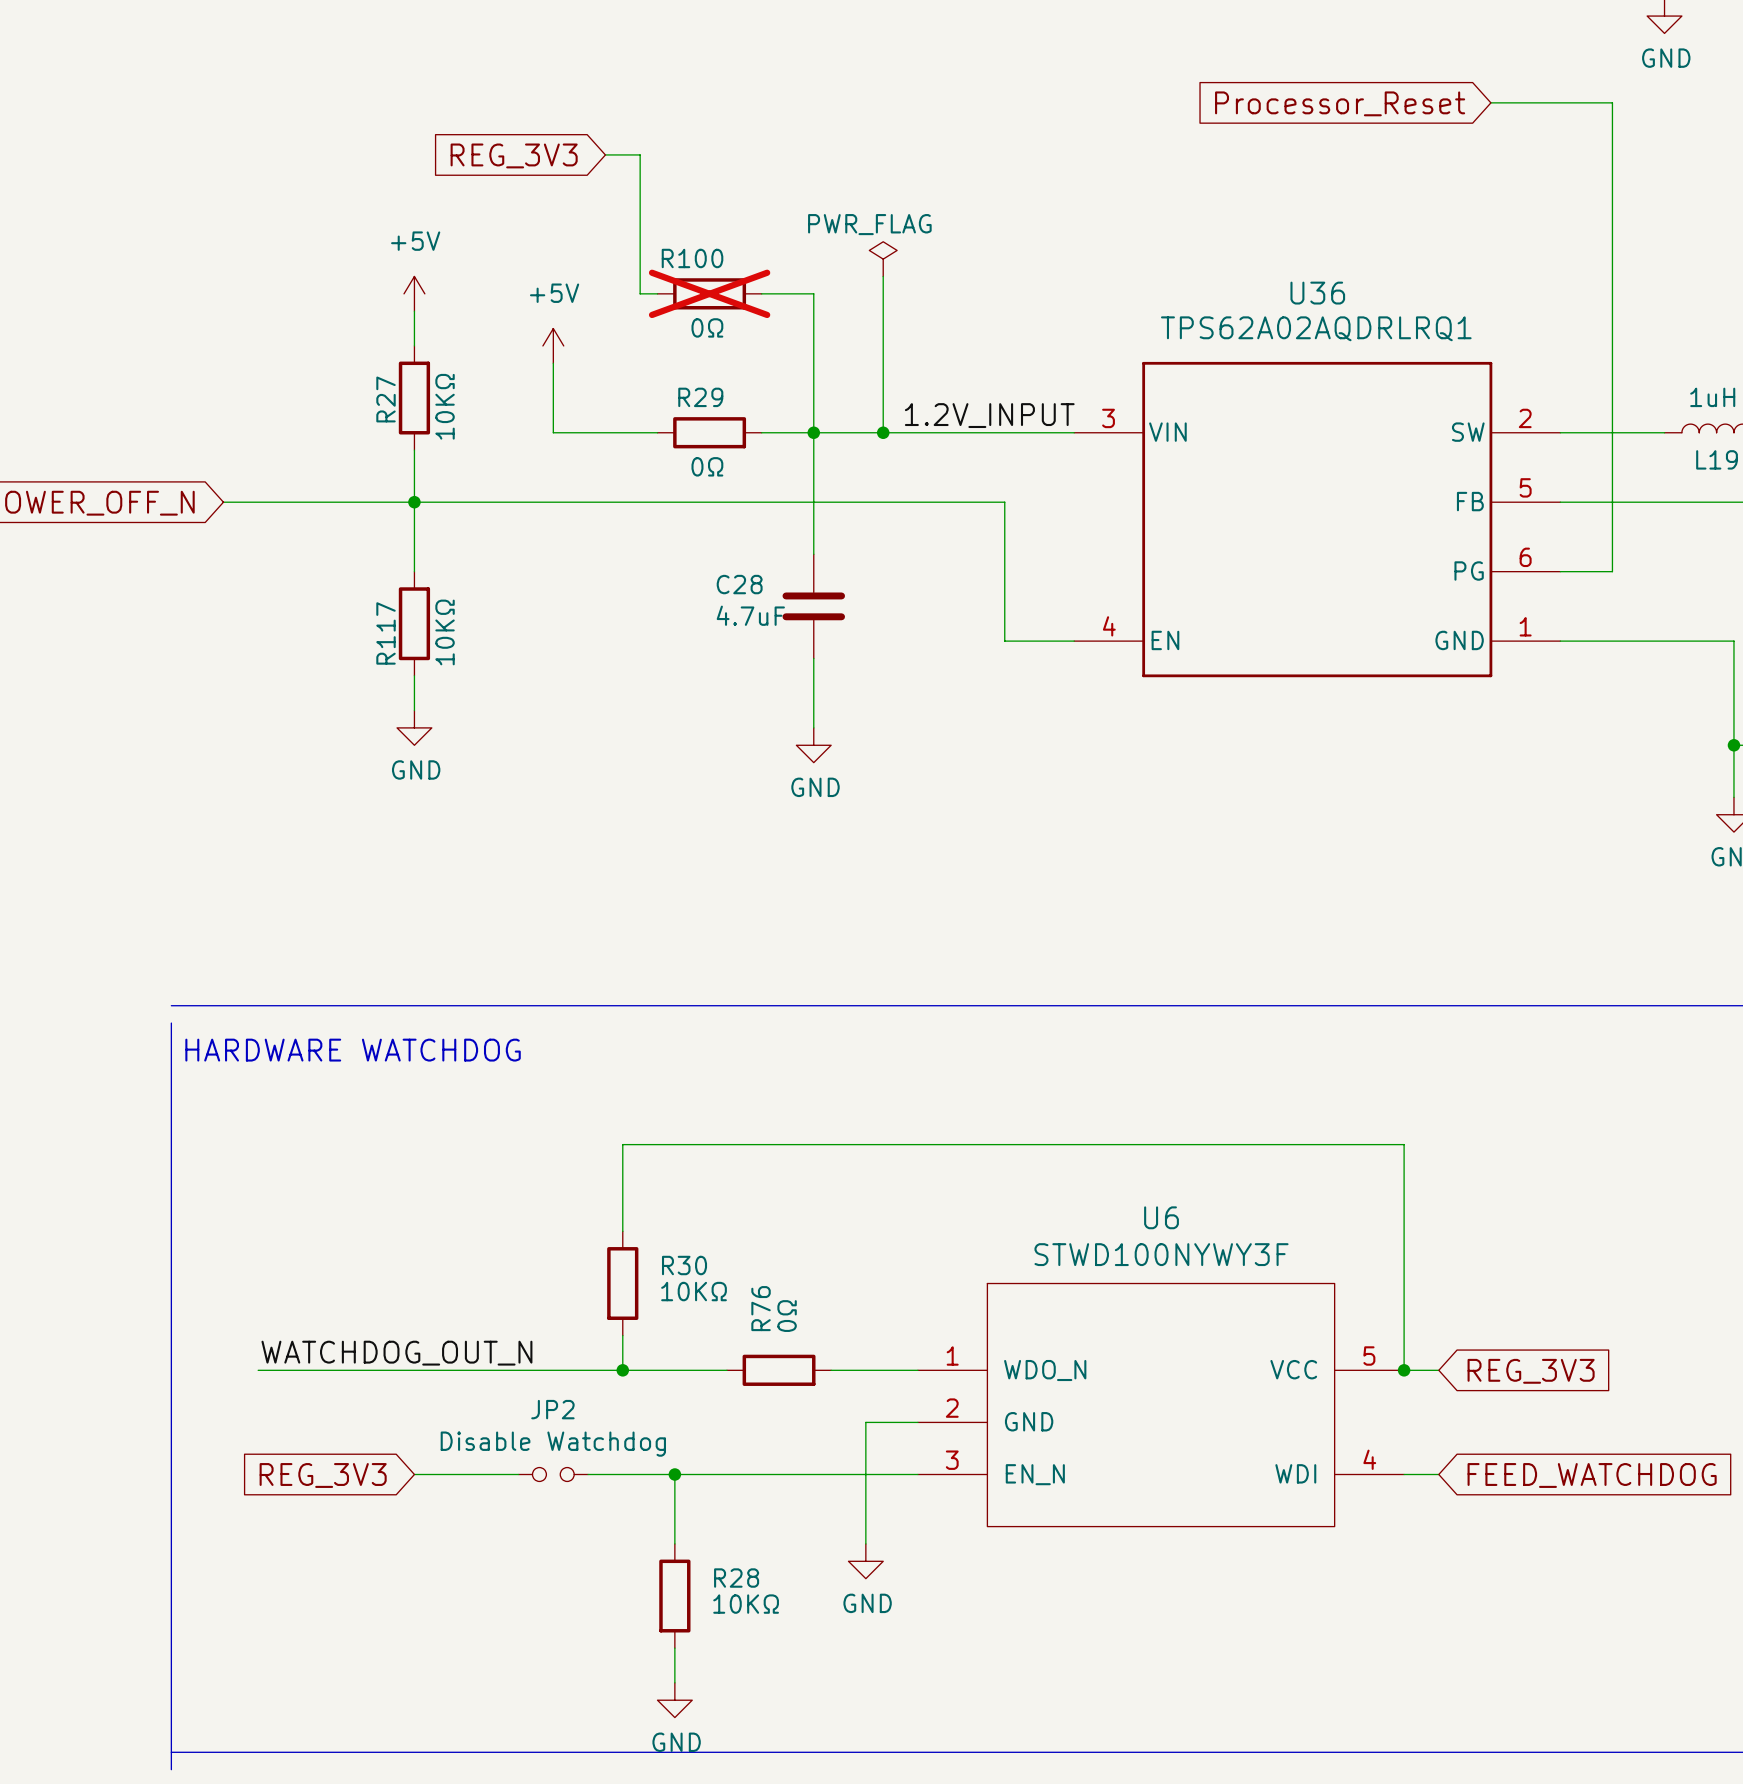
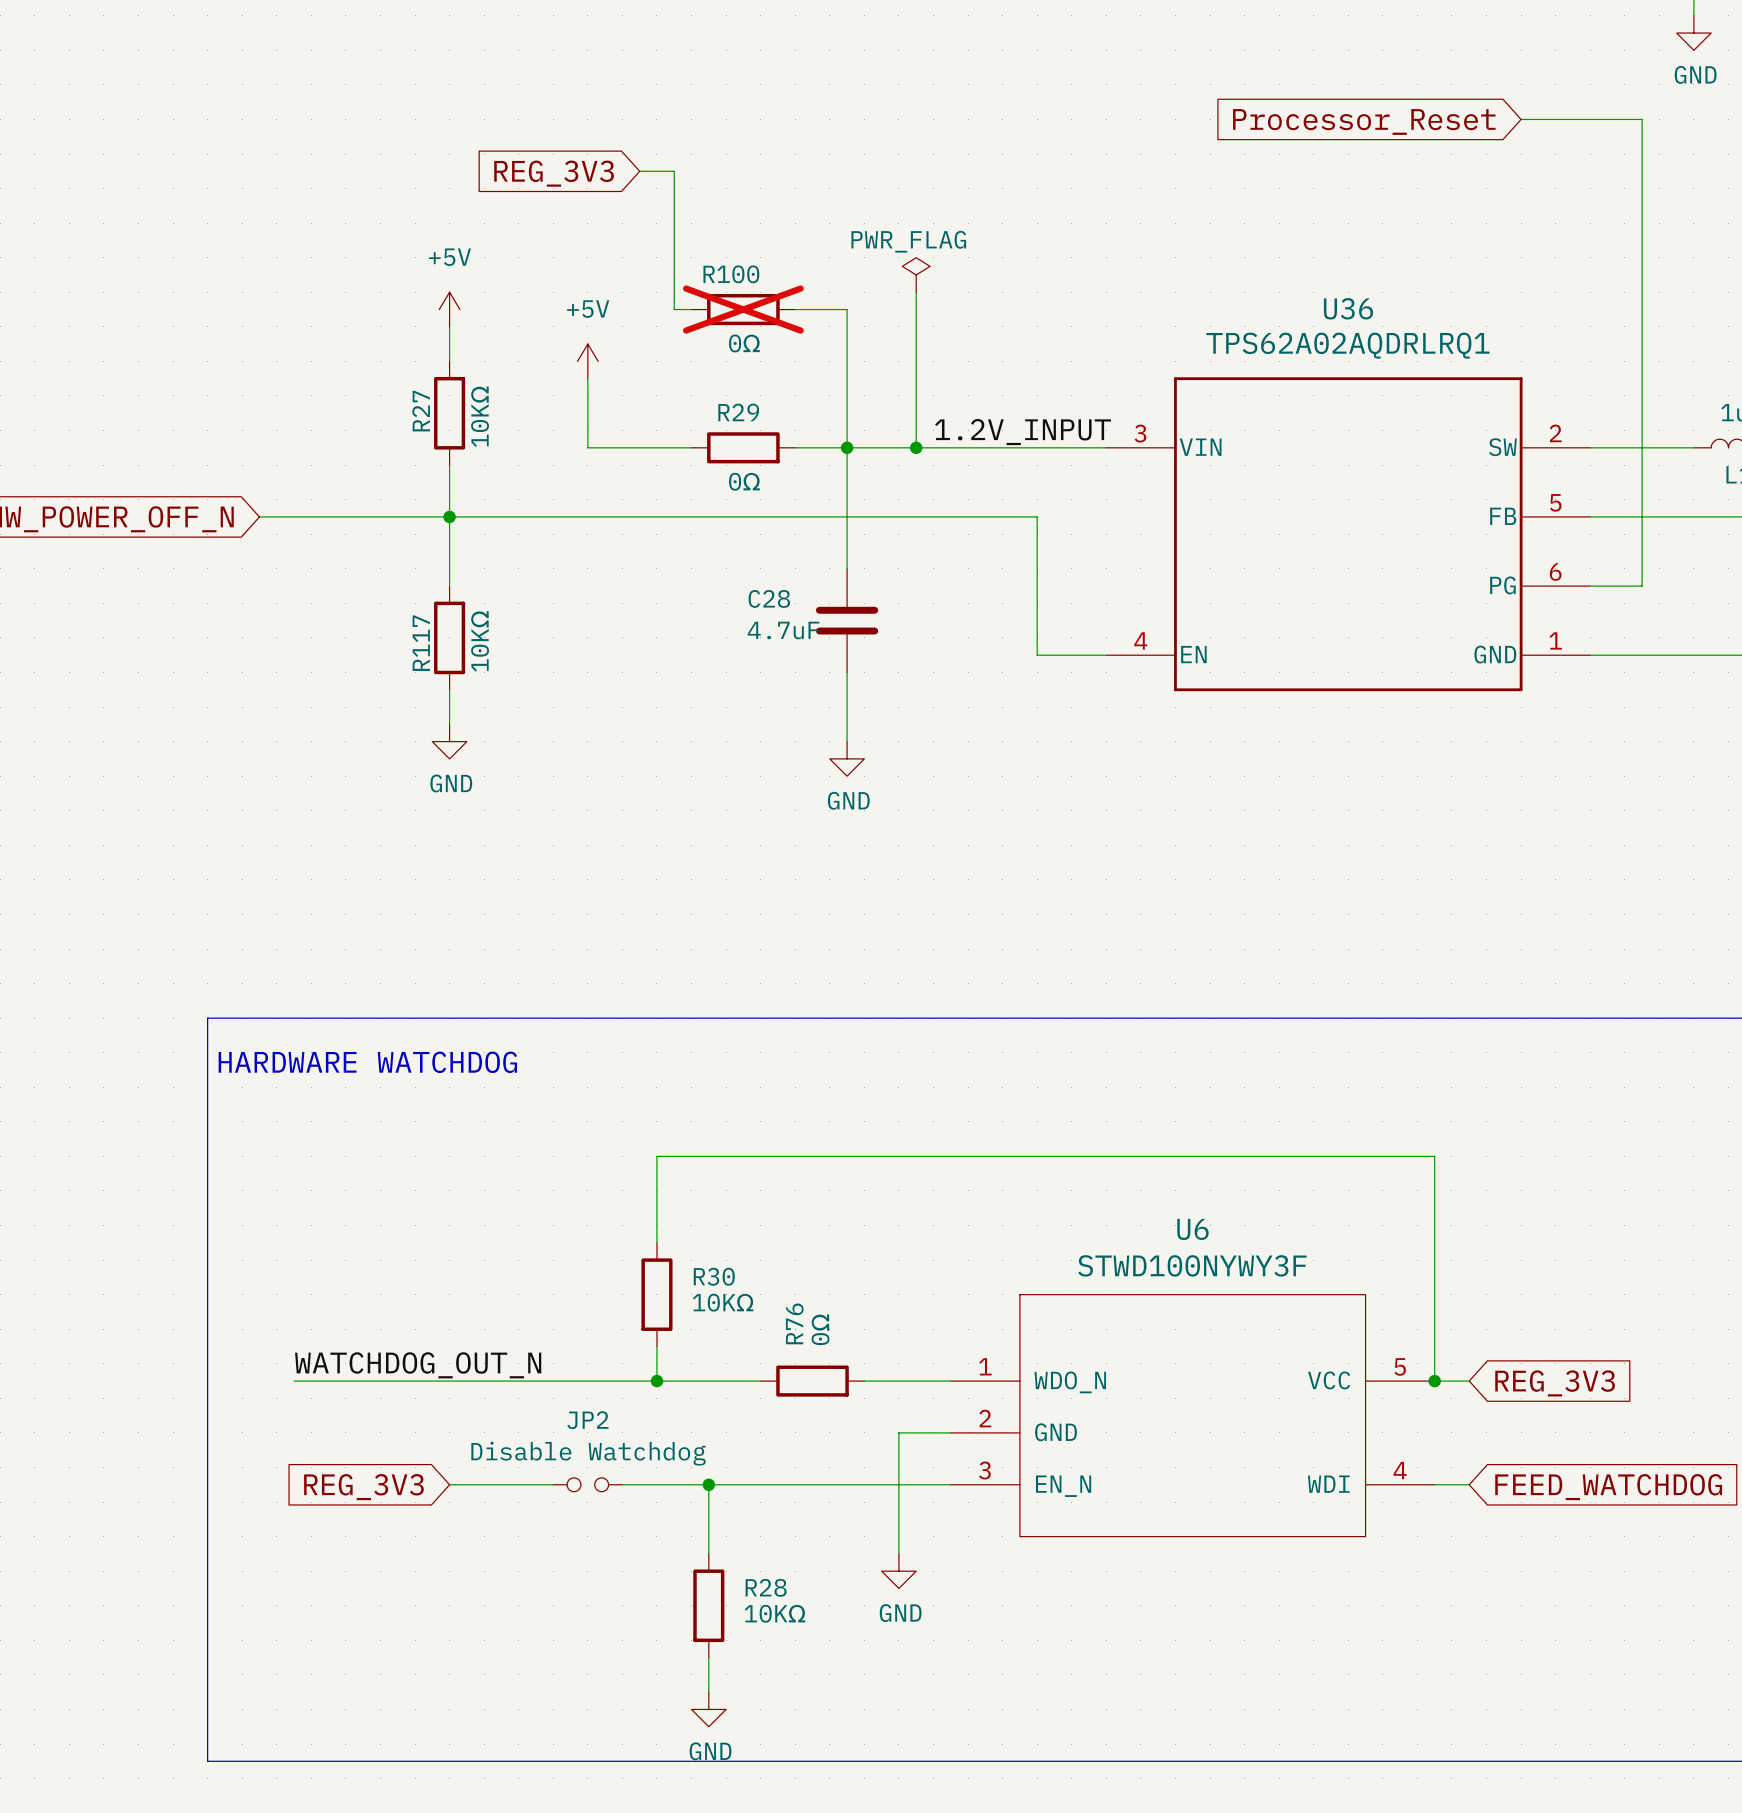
line: none -> (207, 1018) (207, 1035)
line: (171, 1752) (171, 1769) -> none

